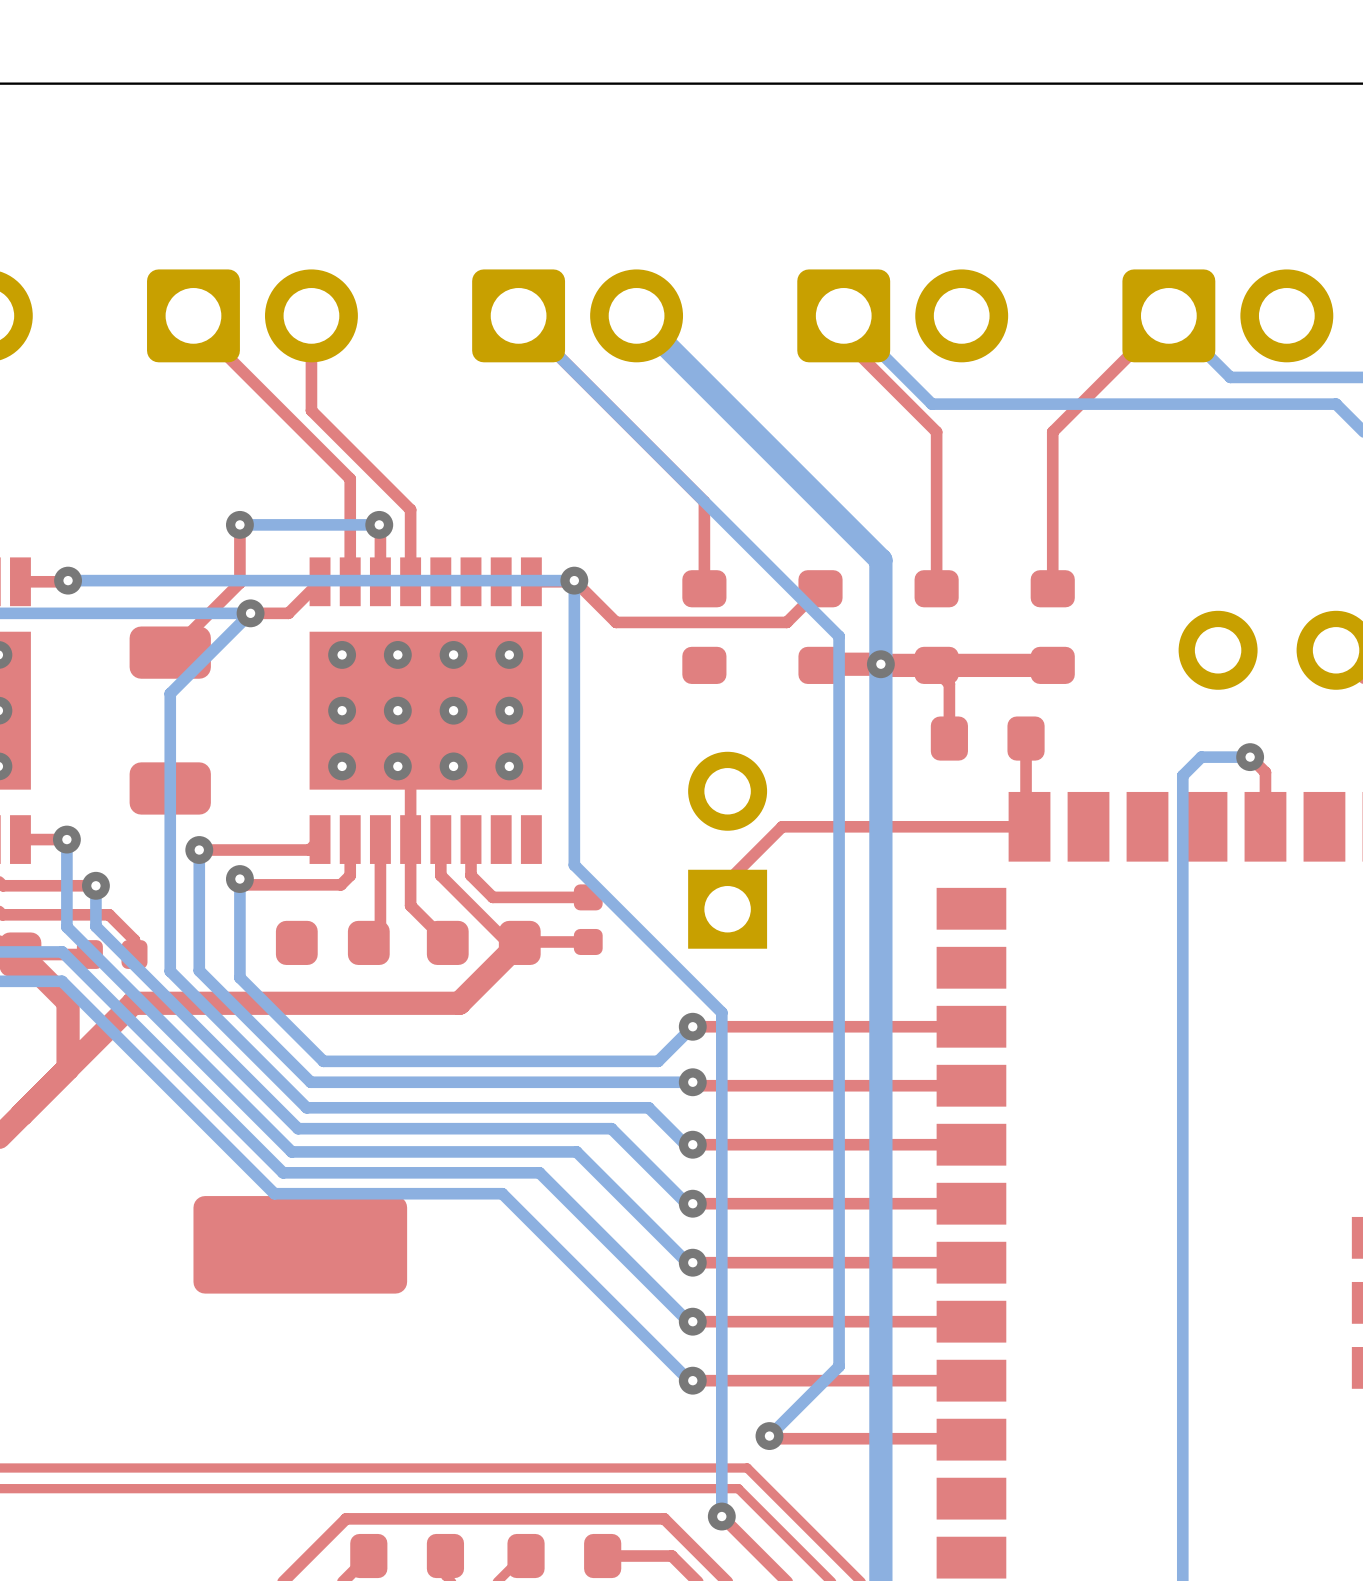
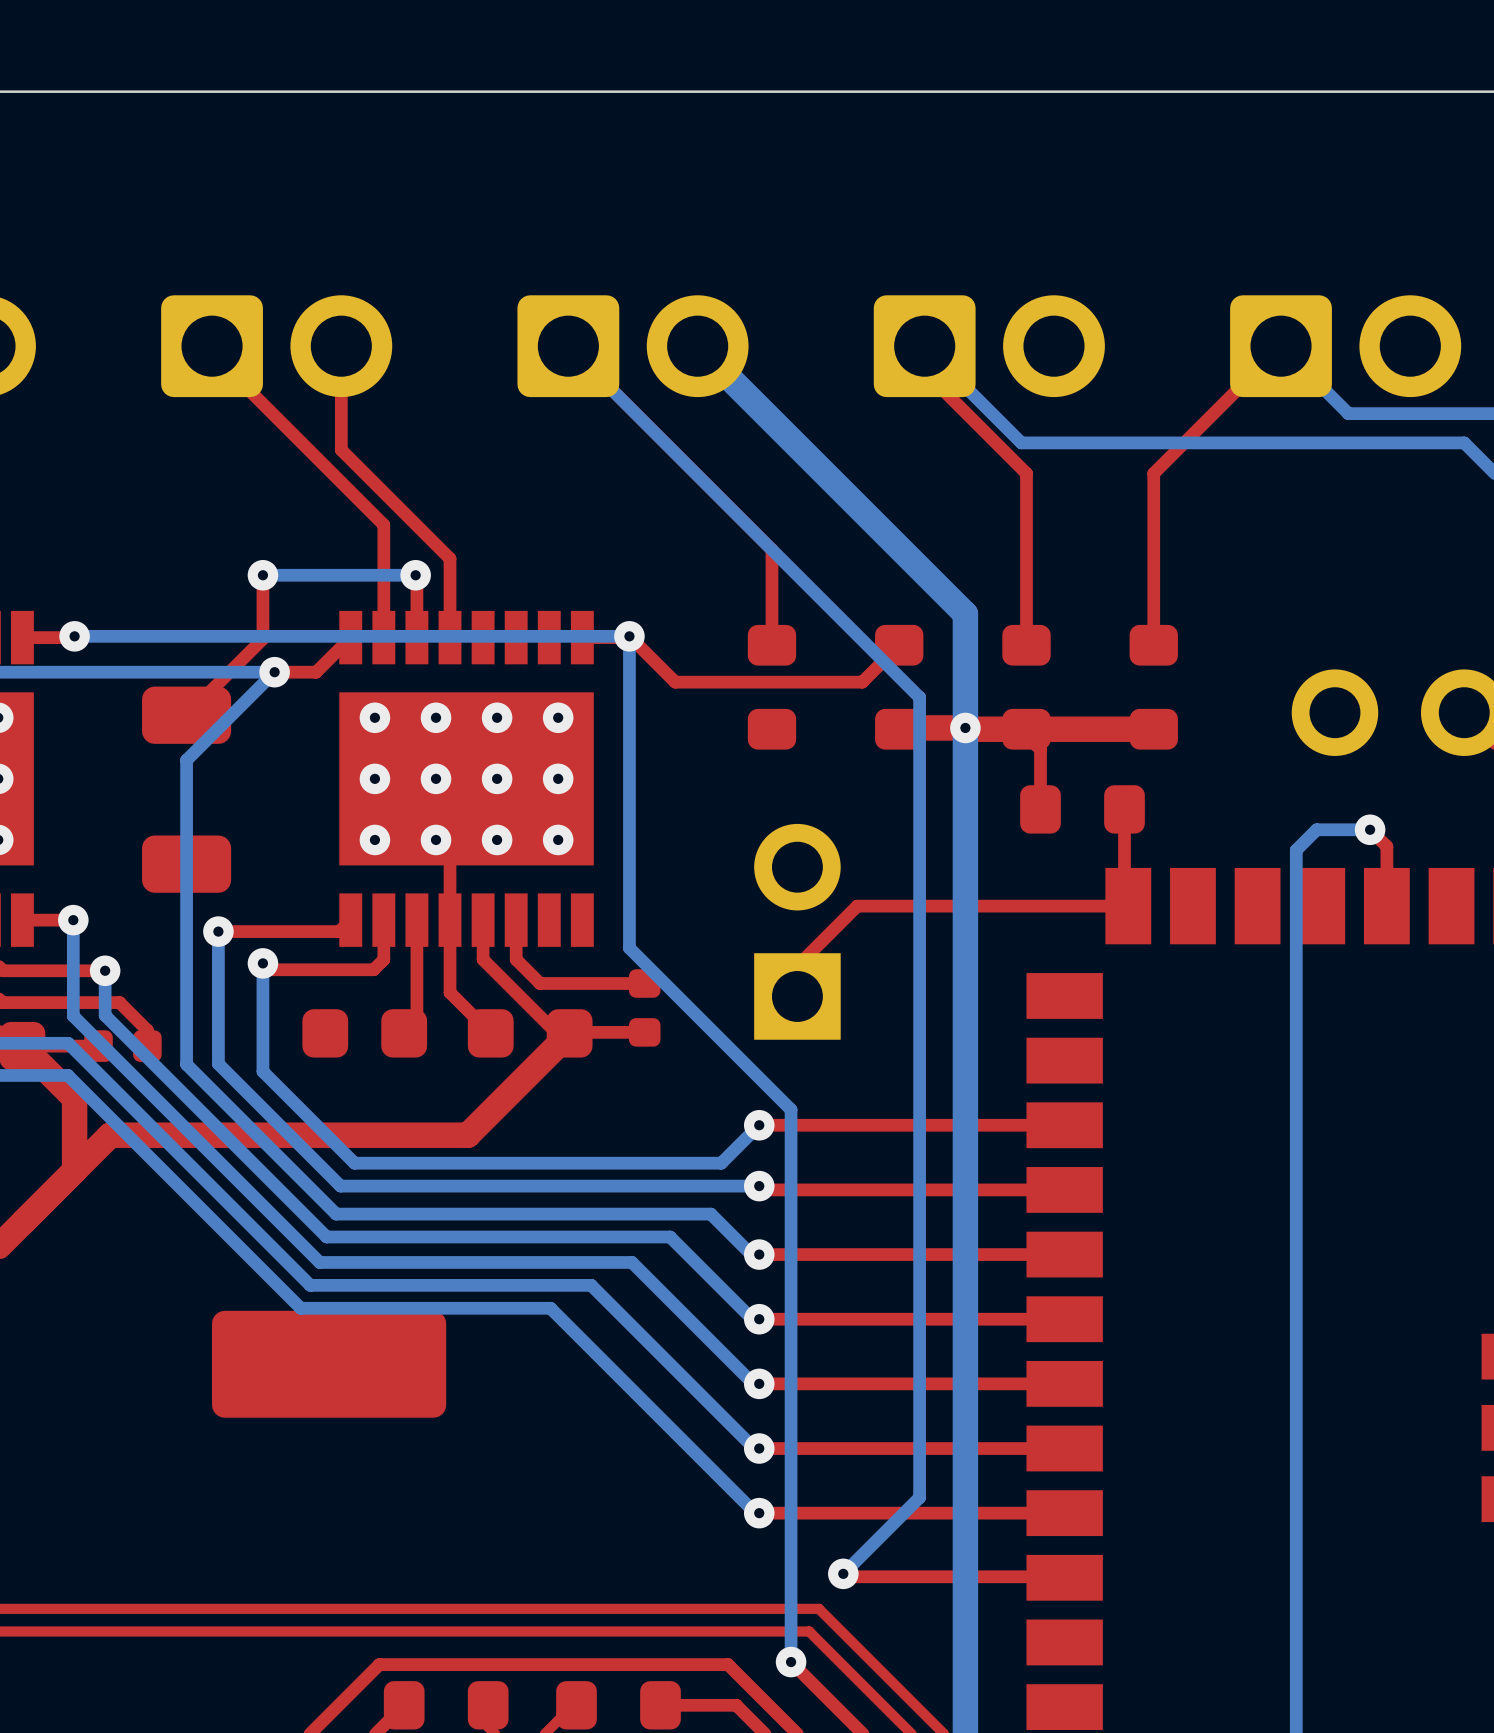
top track: (459, 1003) (133, 1003) (100, 1035) -> (503, 1099) (467, 1135) (110, 1135)

